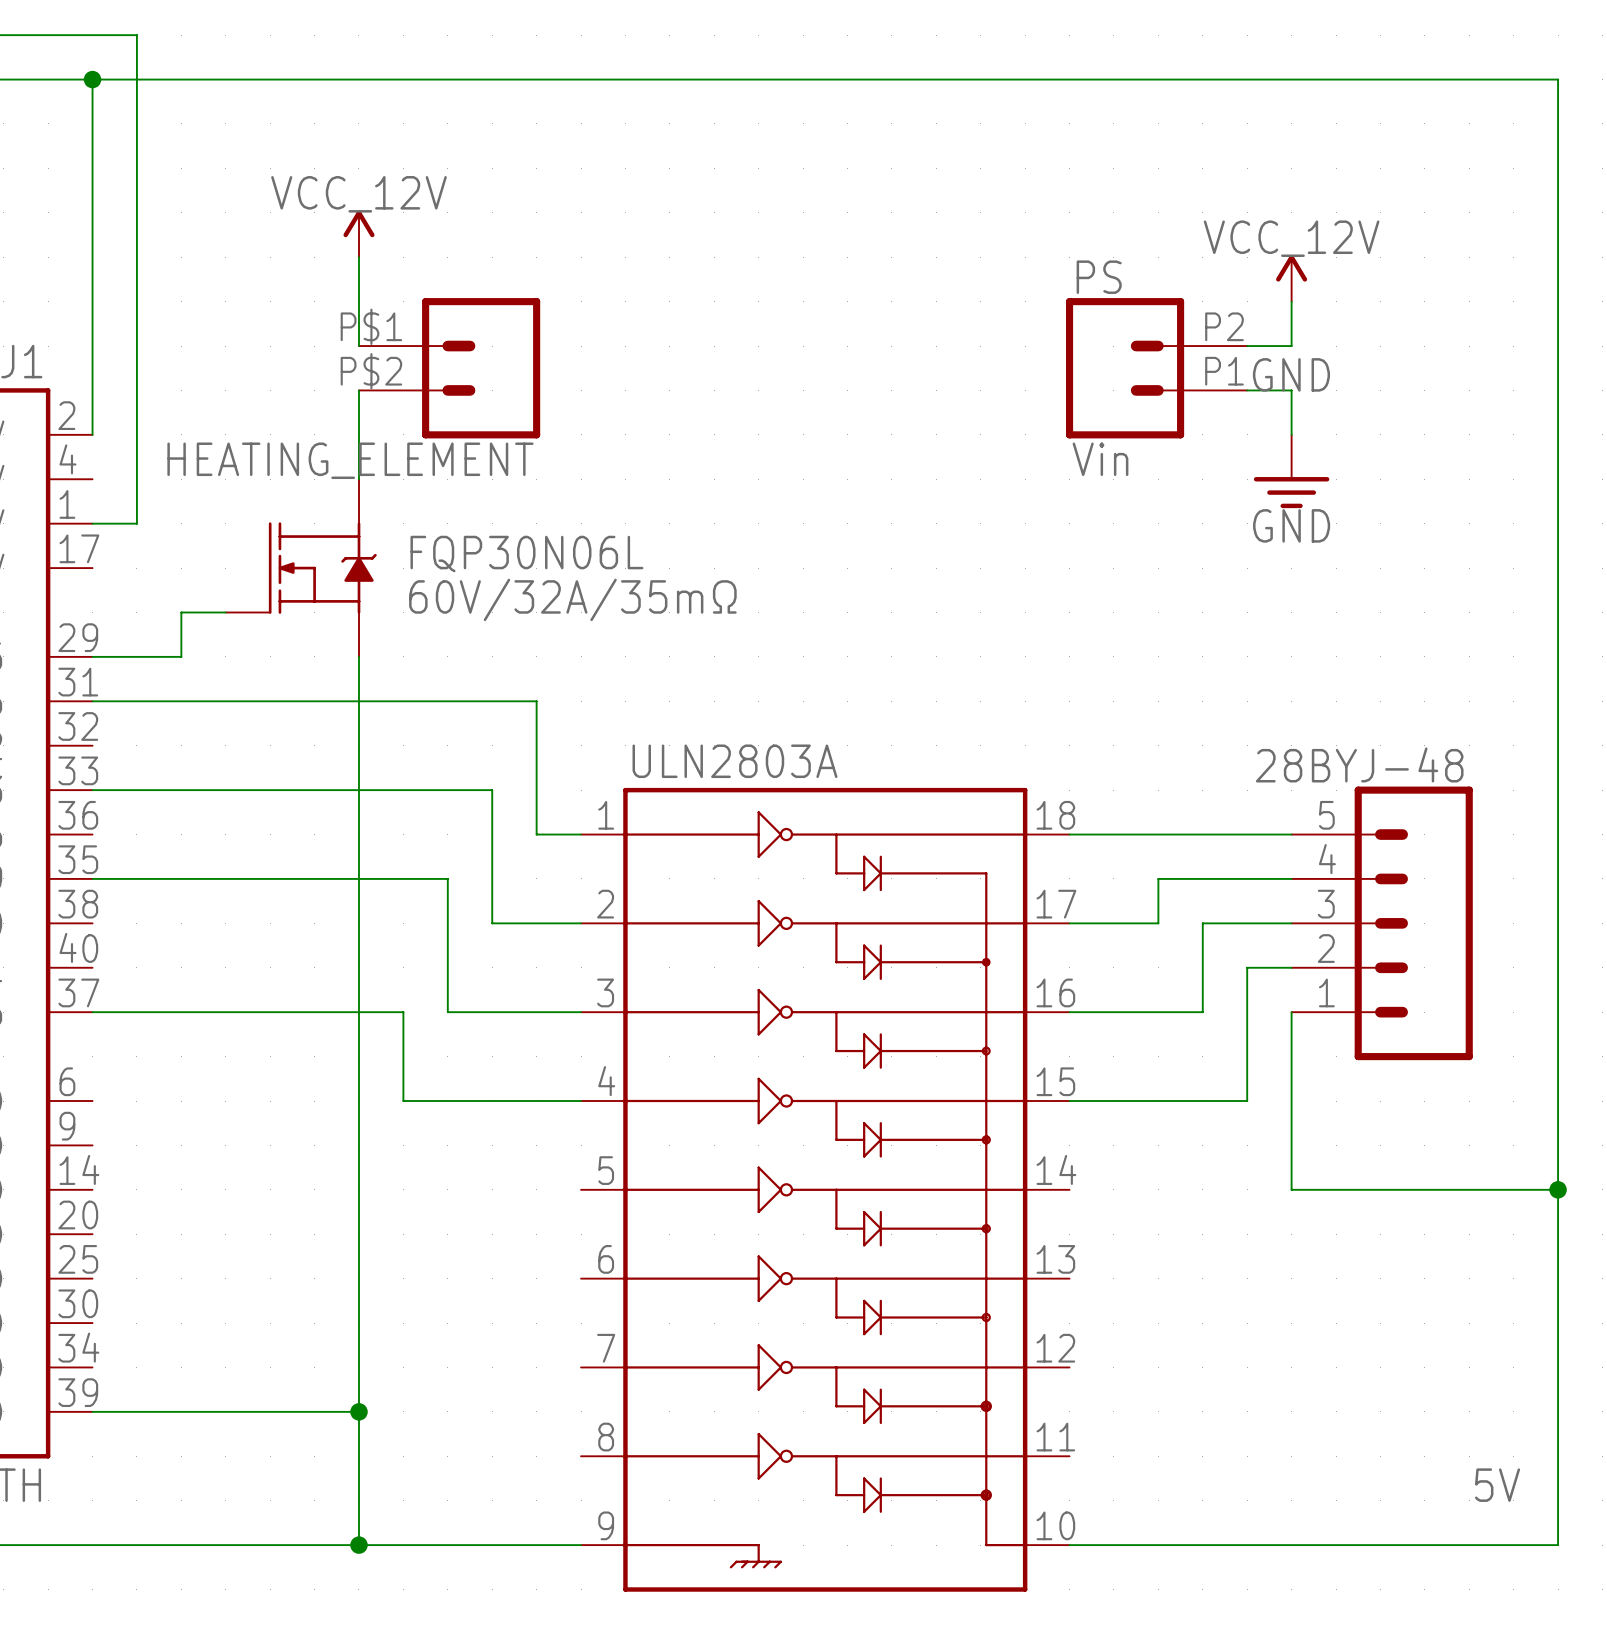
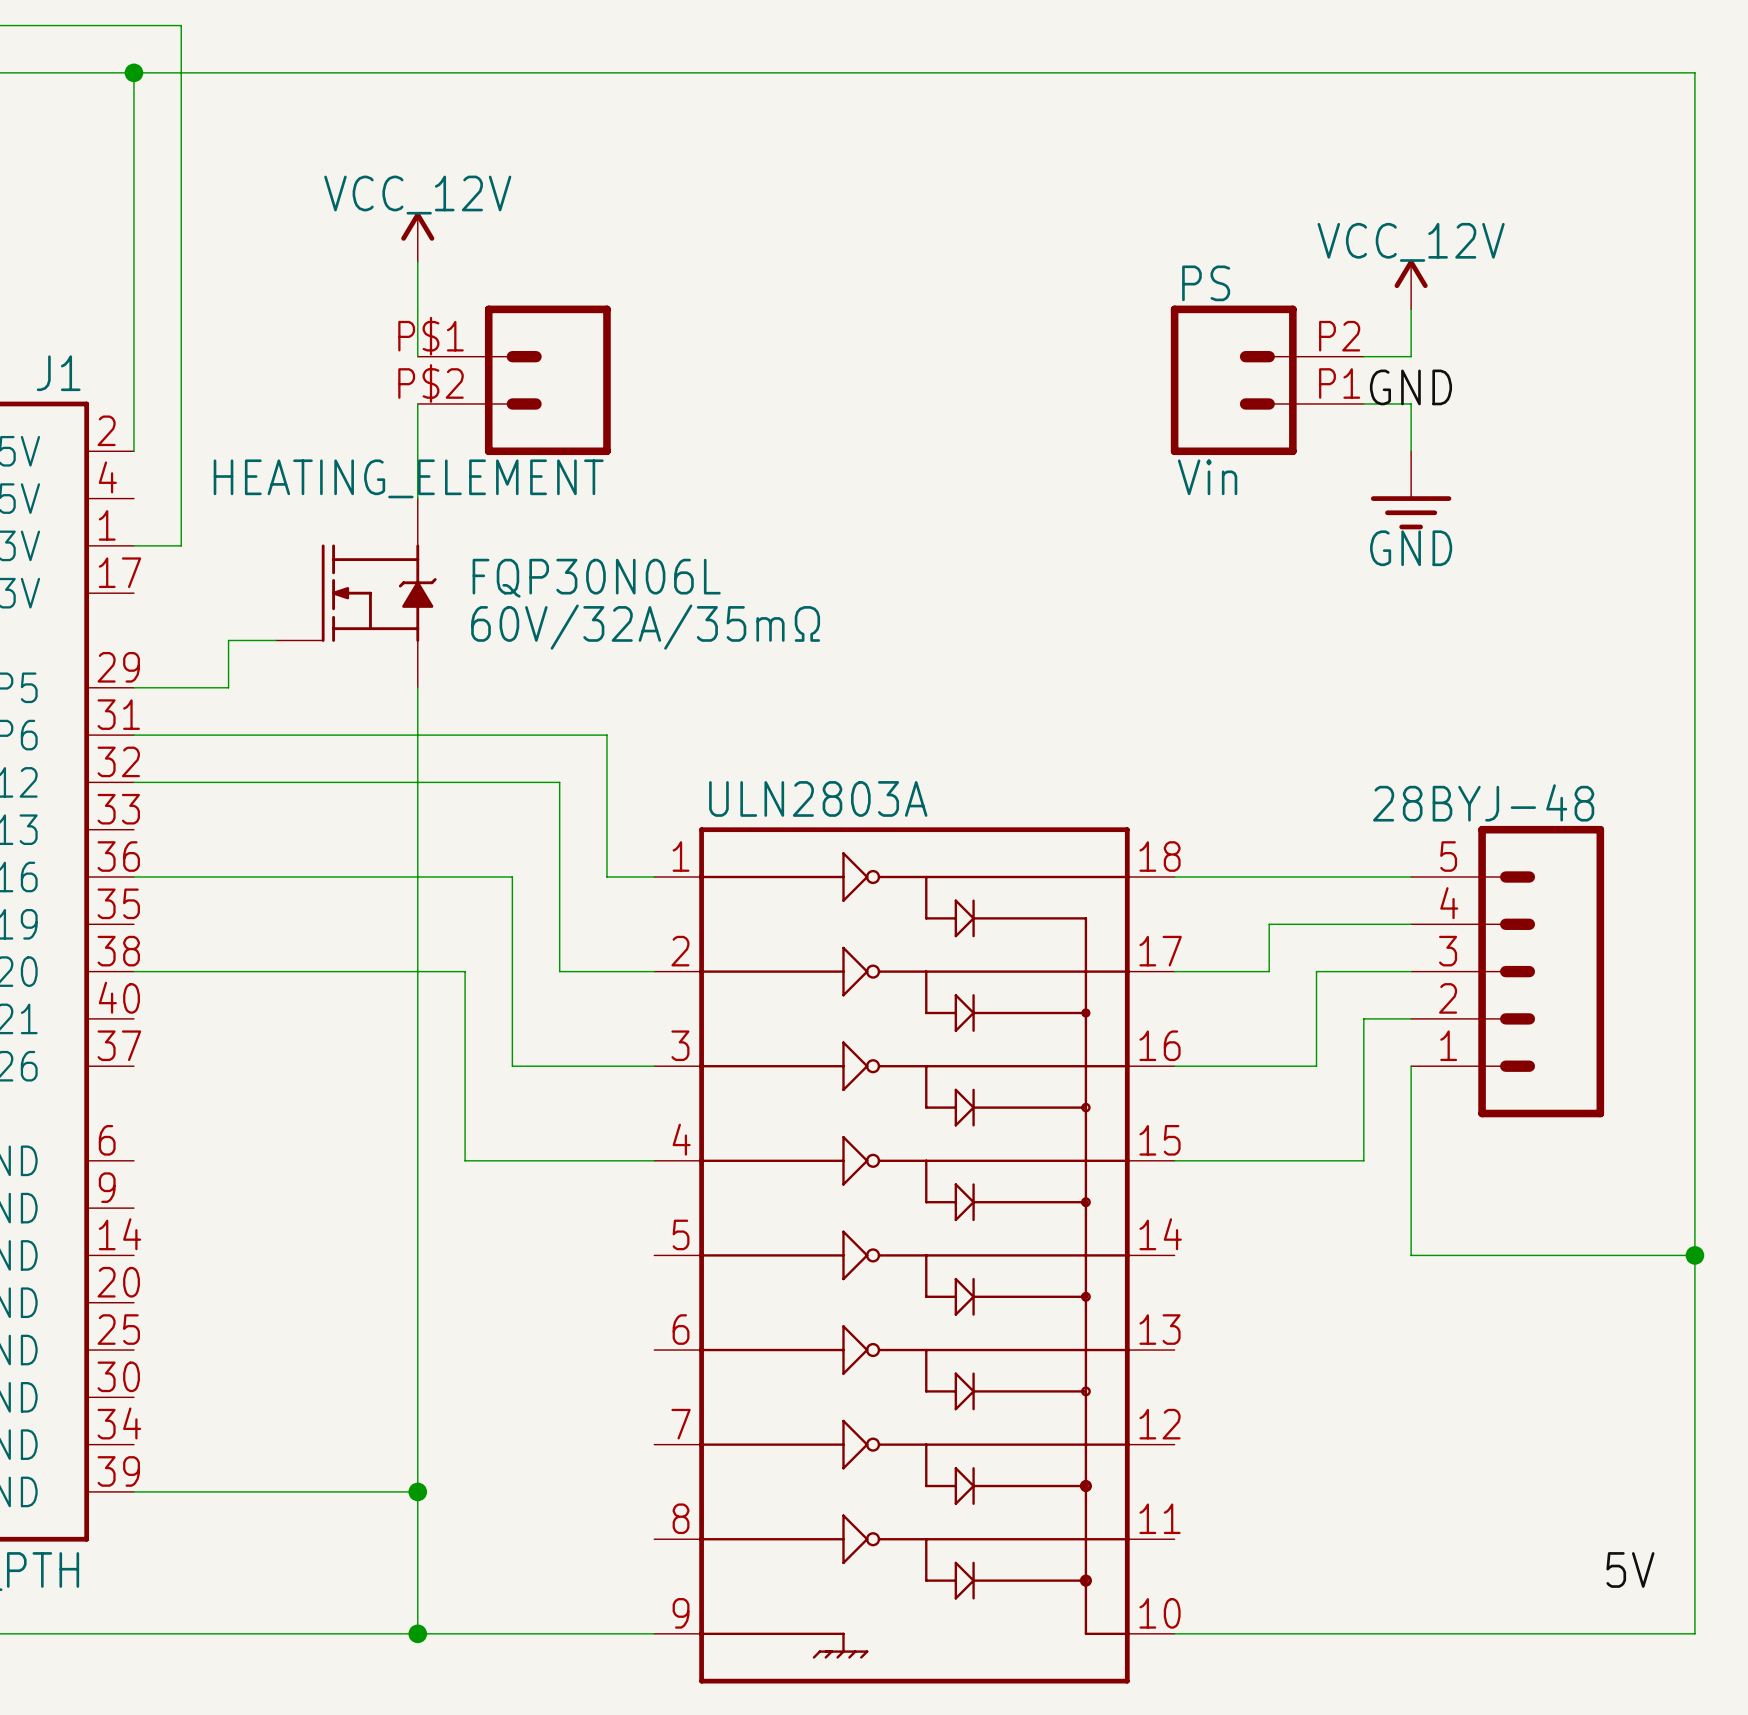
wire: (92, 790) (492, 790) -> (133, 782) (559, 782) (559, 829)
wire: (92, 878) (447, 878) -> (133, 877) (512, 877) (512, 924)
wire: (92, 1012) (403, 1012) -> (133, 971) (465, 971) (465, 1066)

